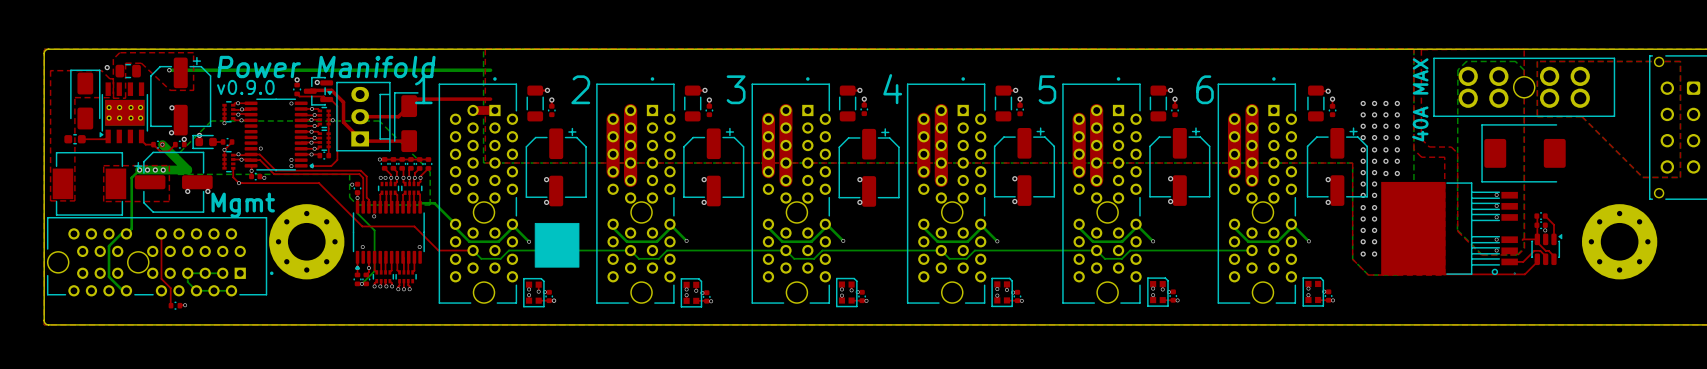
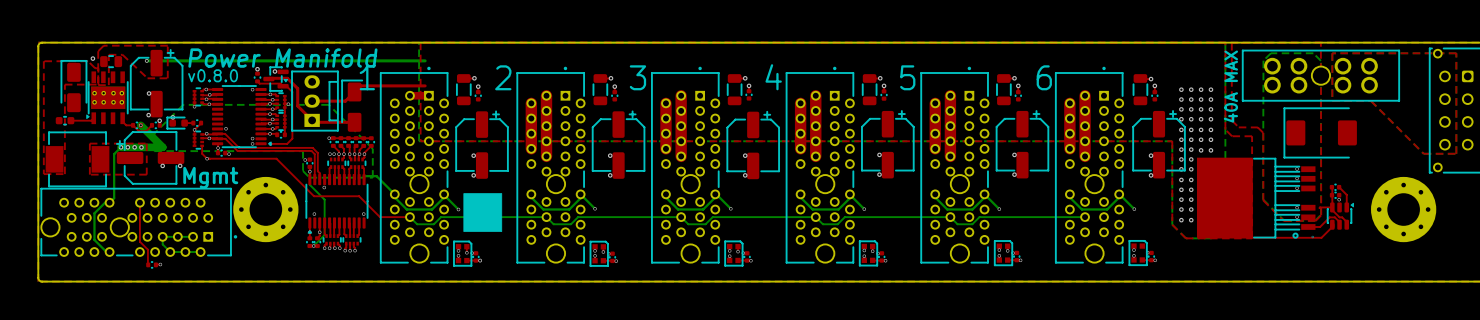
text: v0.9.0 (245, 87) -> v0.8.0 (213, 75)

